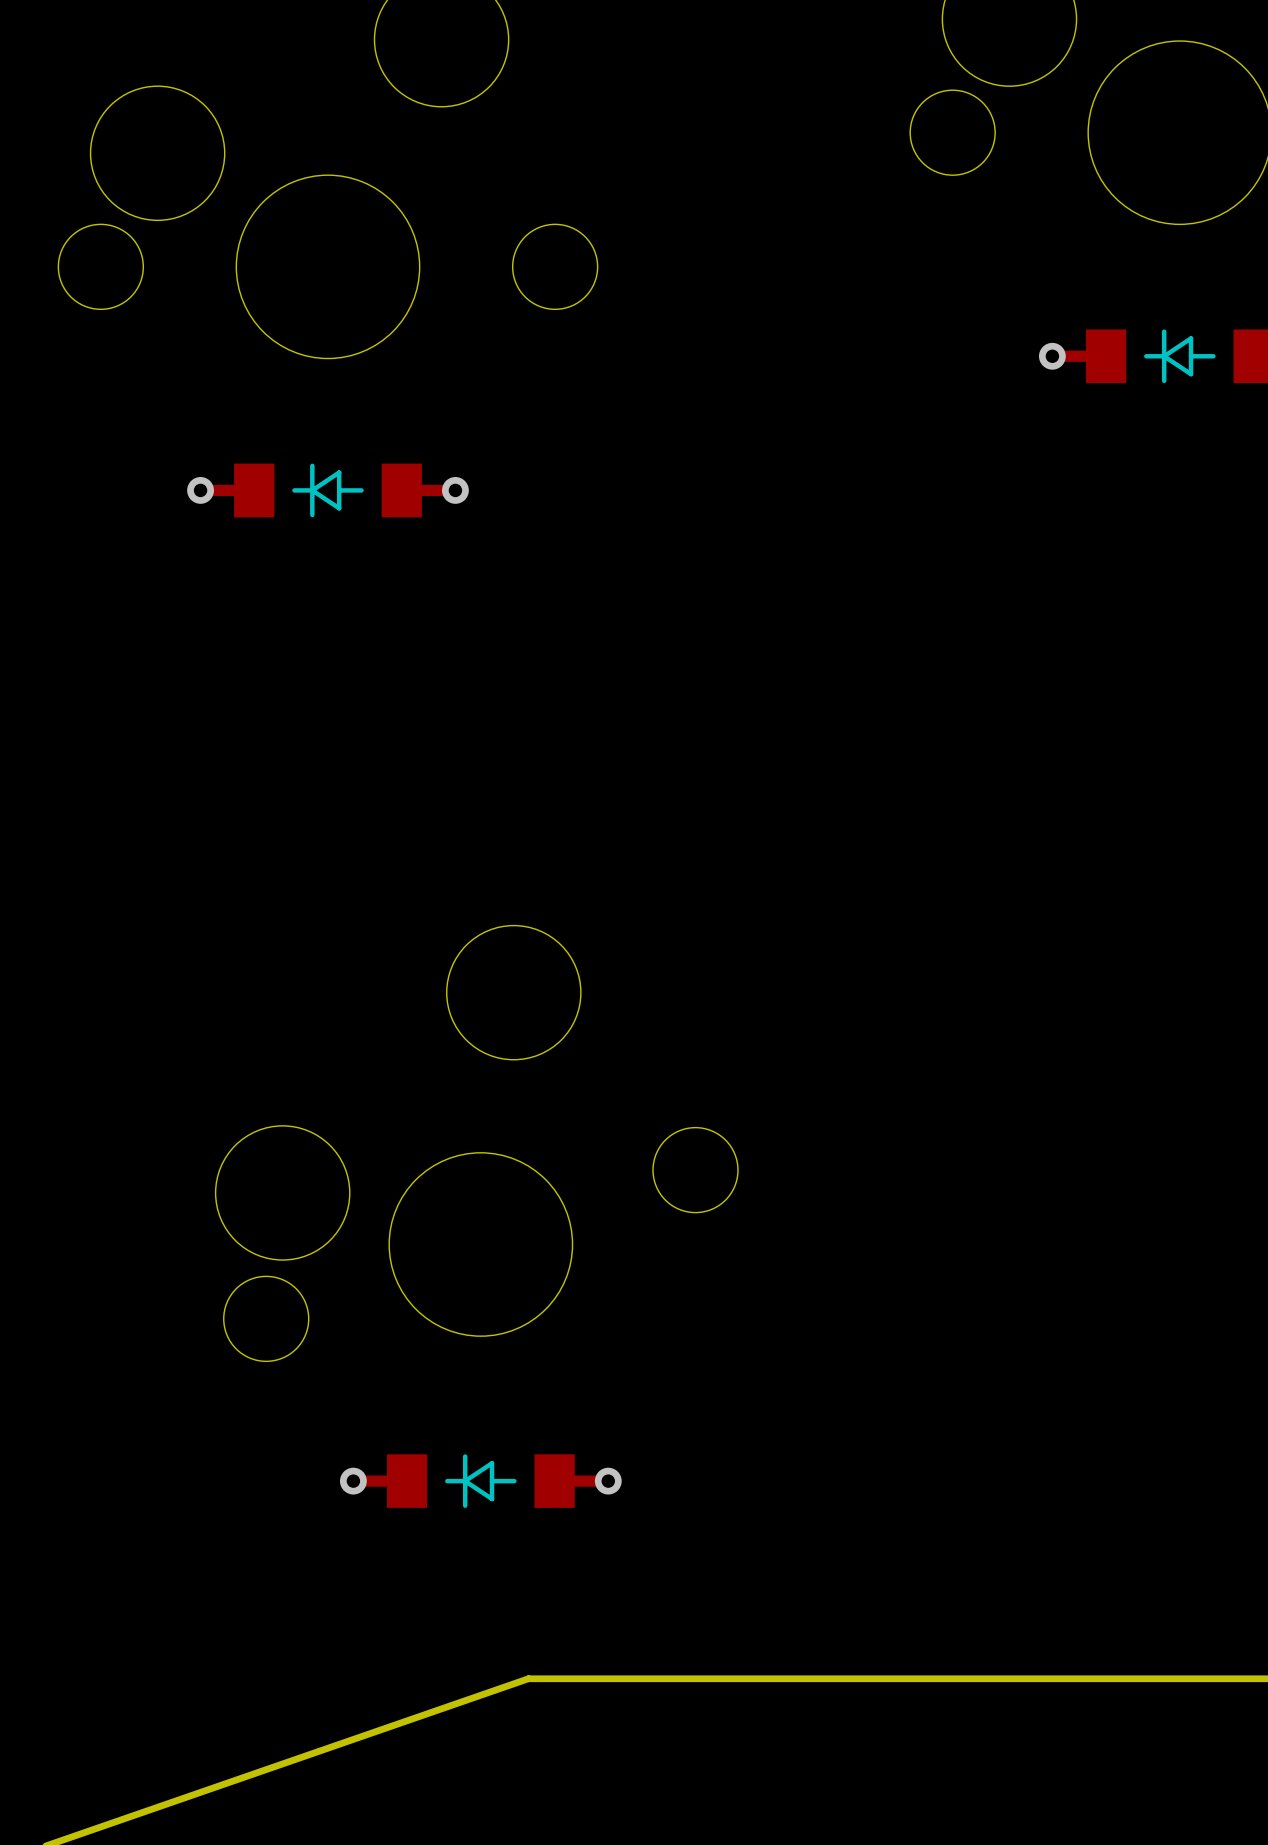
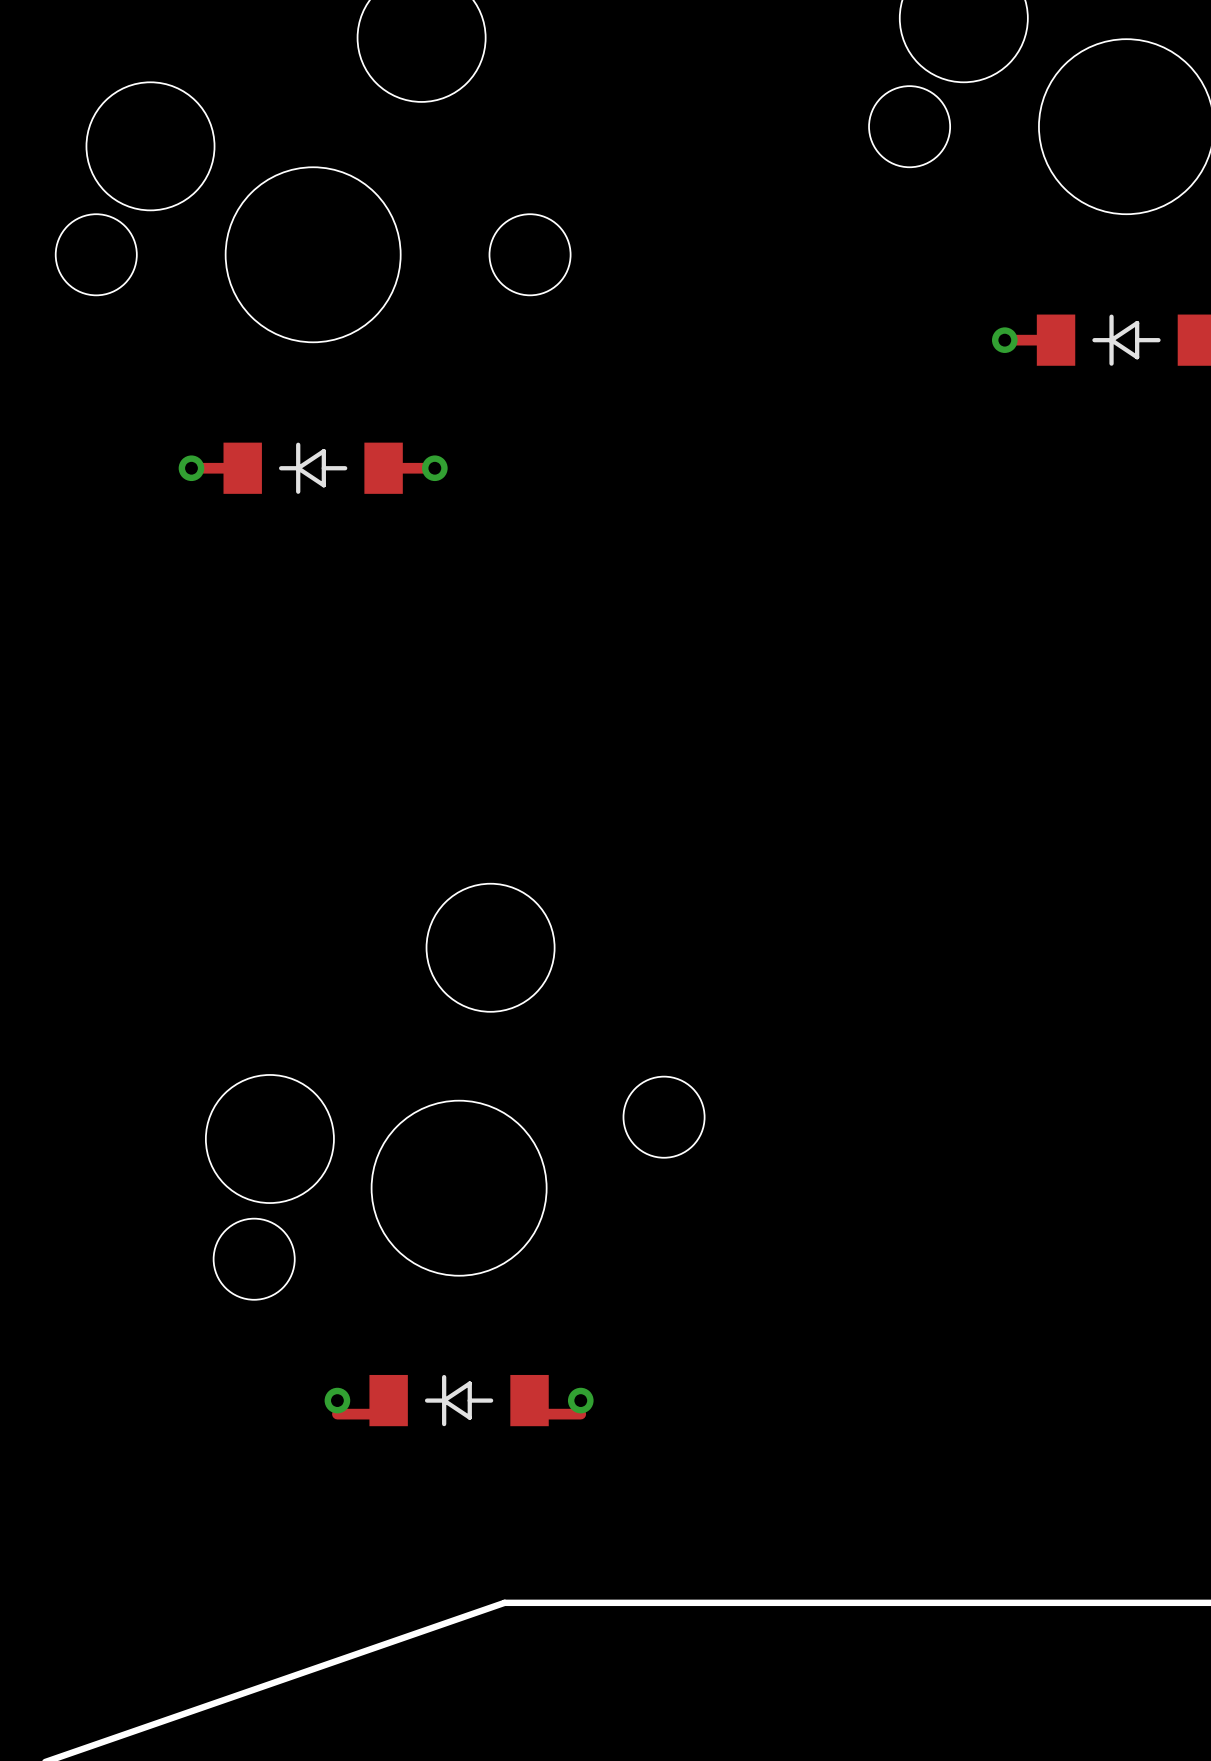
via position: (353, 1481) -> (337, 1400)
part position: (480, 1481) -> (459, 1400)
via position: (608, 1481) -> (580, 1400)

